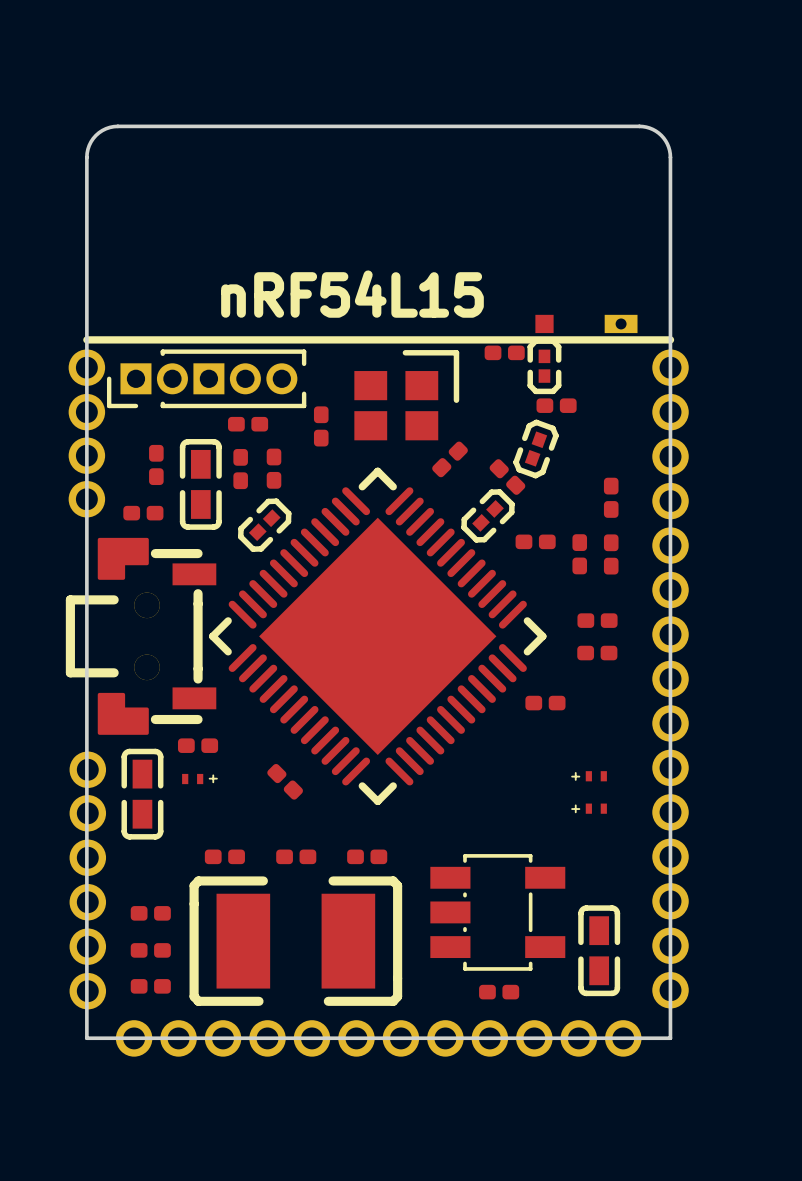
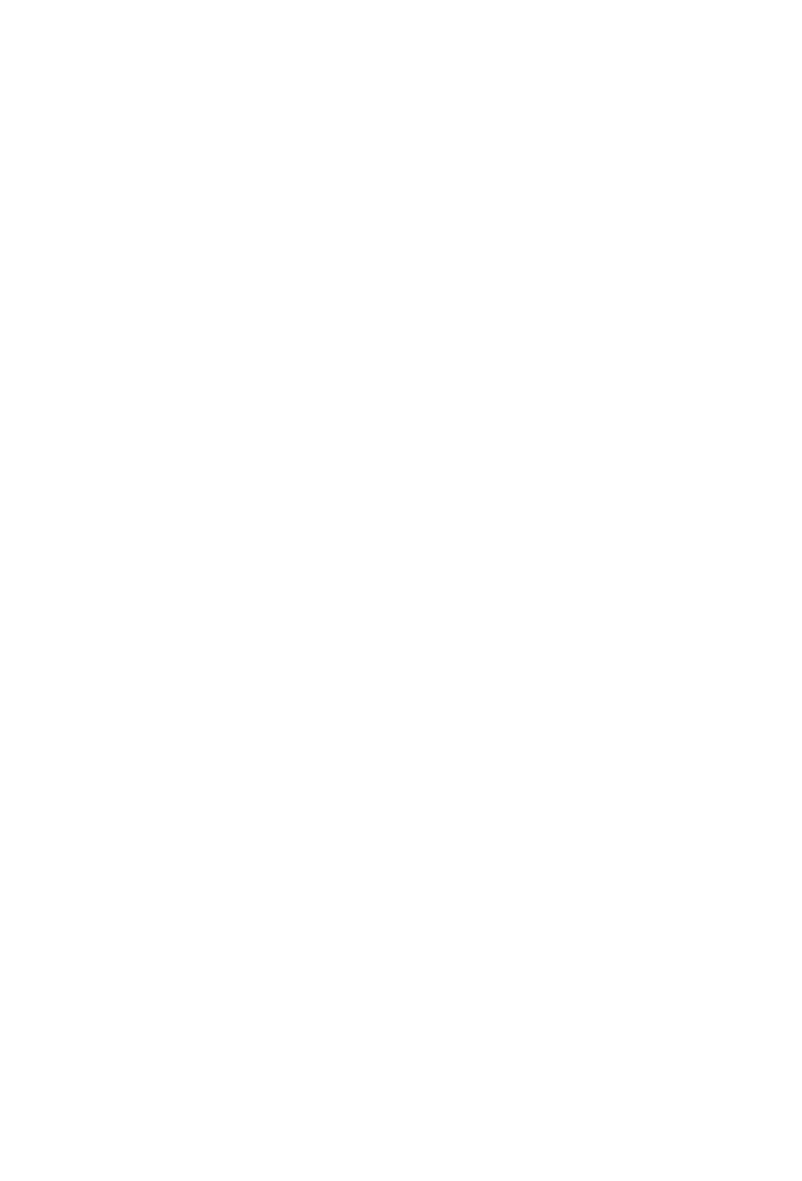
board edge: (117, 126) (639, 126) (652, 129) (665, 140) (670, 157) (670, 1038) (86, 1038) (86, 157) (89, 145) (95, 135) (106, 128) (117, 126) -> none
text: nRF54L15 (352, 294) -> none
part: (586, 323) -> none
line: (86, 339) (670, 339) -> none
part: (504, 352) -> none
part: (544, 366) -> none
part: (86, 367) -> none
part: (670, 367) -> none
part: (206, 378) -> none
part: (406, 395) -> none
part: (556, 405) -> none
part: (86, 412) -> none
part: (670, 412) -> none
part: (248, 424) -> none
part: (321, 426) -> none
part: (536, 449) -> none
part: (86, 455) -> none
part: (670, 456) -> none
part: (450, 459) -> none
part: (156, 464) -> none
part: (274, 468) -> none
part: (240, 469) -> none
part: (507, 477) -> none
part: (200, 484) -> none
part: (611, 497) -> none
part: (86, 499) -> none
part: (670, 501) -> none
part: (143, 513) -> none
part: (488, 515) -> none
part: (264, 525) -> none
part: (535, 541) -> none
part: (670, 545) -> none
part: (579, 554) -> none
part: (611, 554) -> none
part: (670, 590) -> none
part: (597, 620) -> none
part: (670, 634) -> none
part: (141, 636) -> none
part: (374, 636) -> none
part: (597, 653) -> none
part: (670, 678) -> none
part: (545, 703) -> none
part: (670, 723) -> none
part: (198, 745) -> none
part: (670, 767) -> none
part: (87, 769) -> none
part: (589, 776) -> none
part: (199, 779) -> none
part: (285, 781) -> none
part: (142, 794) -> none
part: (589, 808) -> none
part: (670, 812) -> none
part: (87, 813) -> none
part: (224, 856) -> none
part: (296, 856) -> none
part: (367, 856) -> none
part: (670, 856) -> none
part: (87, 857) -> none
part: (670, 901) -> none
part: (87, 902) -> none
part: (497, 912) -> none
part: (150, 913) -> none
part: (295, 941) -> none
part: (670, 945) -> none
part: (87, 946) -> none
part: (150, 950) -> none
part: (599, 950) -> none
part: (150, 986) -> none
part: (670, 990) -> none
part: (87, 991) -> none
part: (499, 992) -> none
part: (134, 1038) -> none
part: (178, 1038) -> none
part: (223, 1038) -> none
part: (267, 1038) -> none
part: (311, 1038) -> none
part: (356, 1038) -> none
part: (400, 1038) -> none
part: (445, 1038) -> none
part: (489, 1038) -> none
part: (534, 1038) -> none
part: (578, 1038) -> none
part: (623, 1038) -> none

